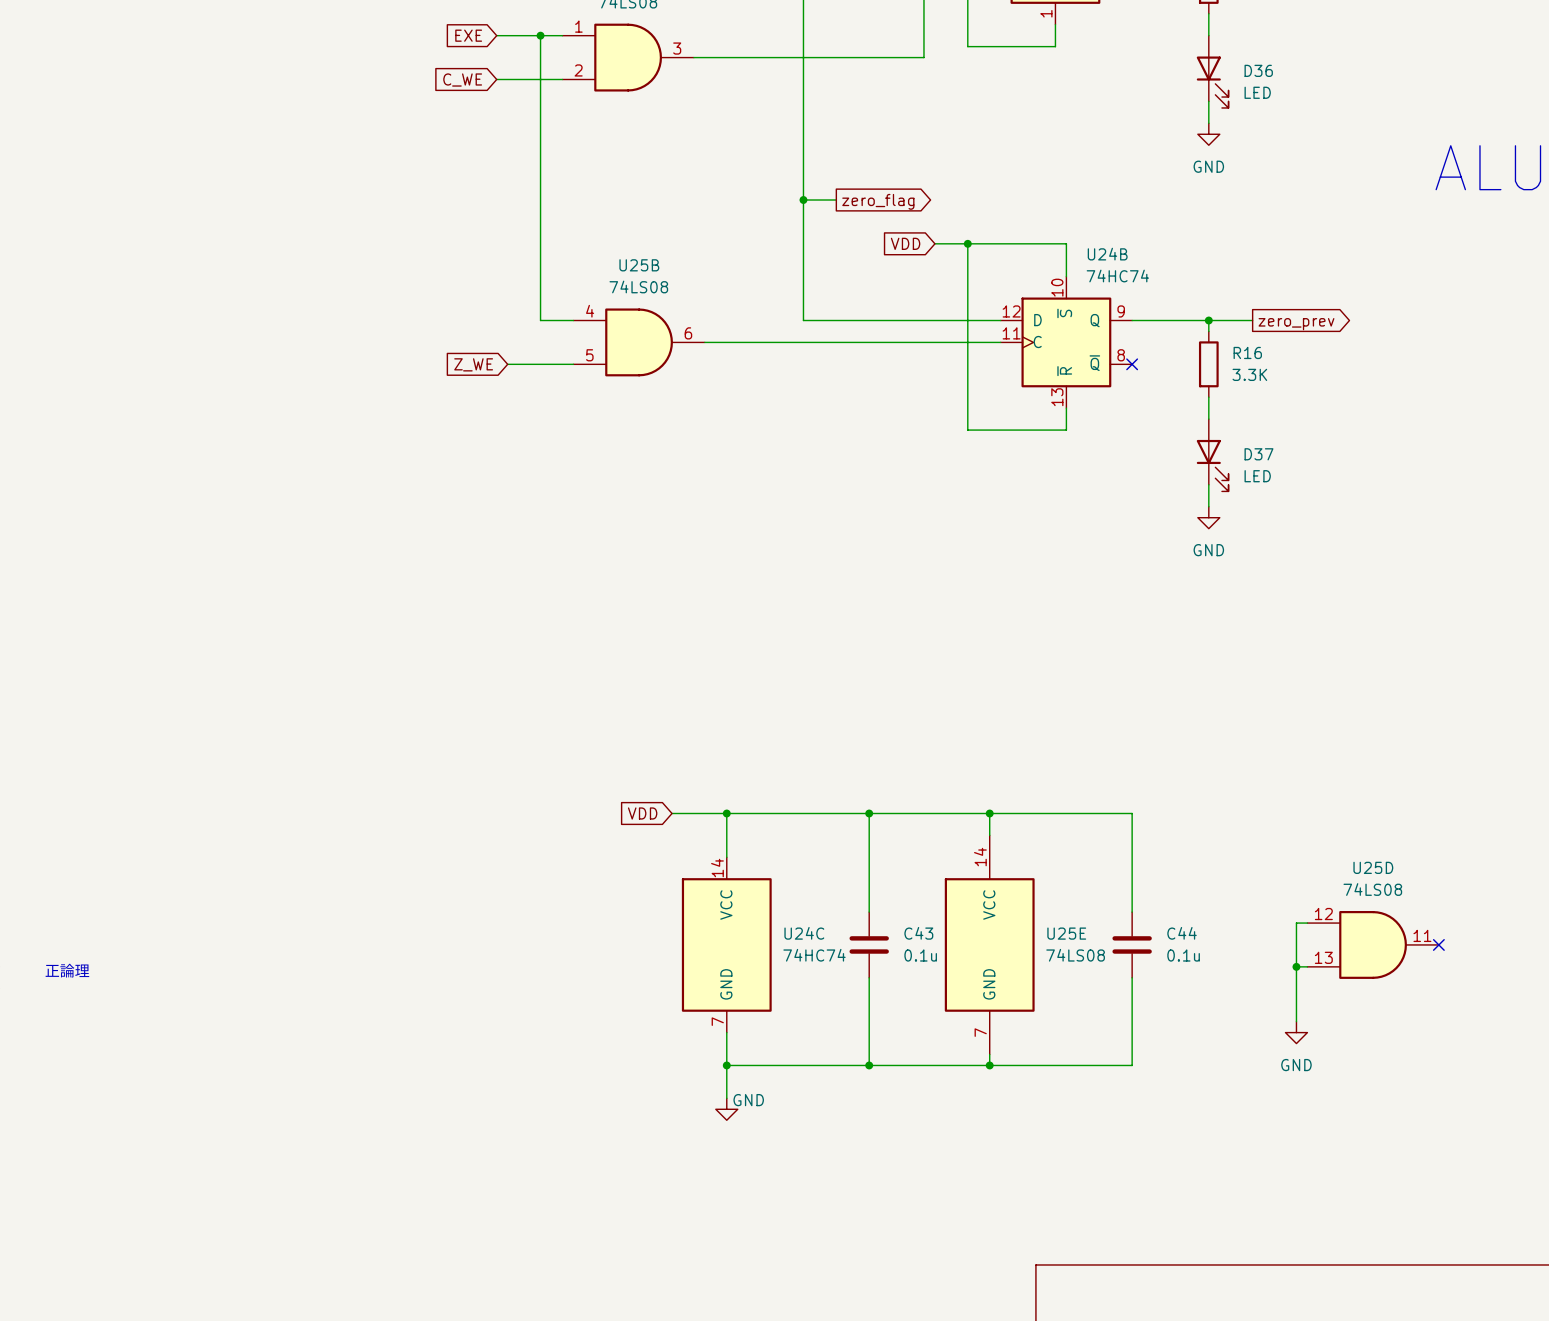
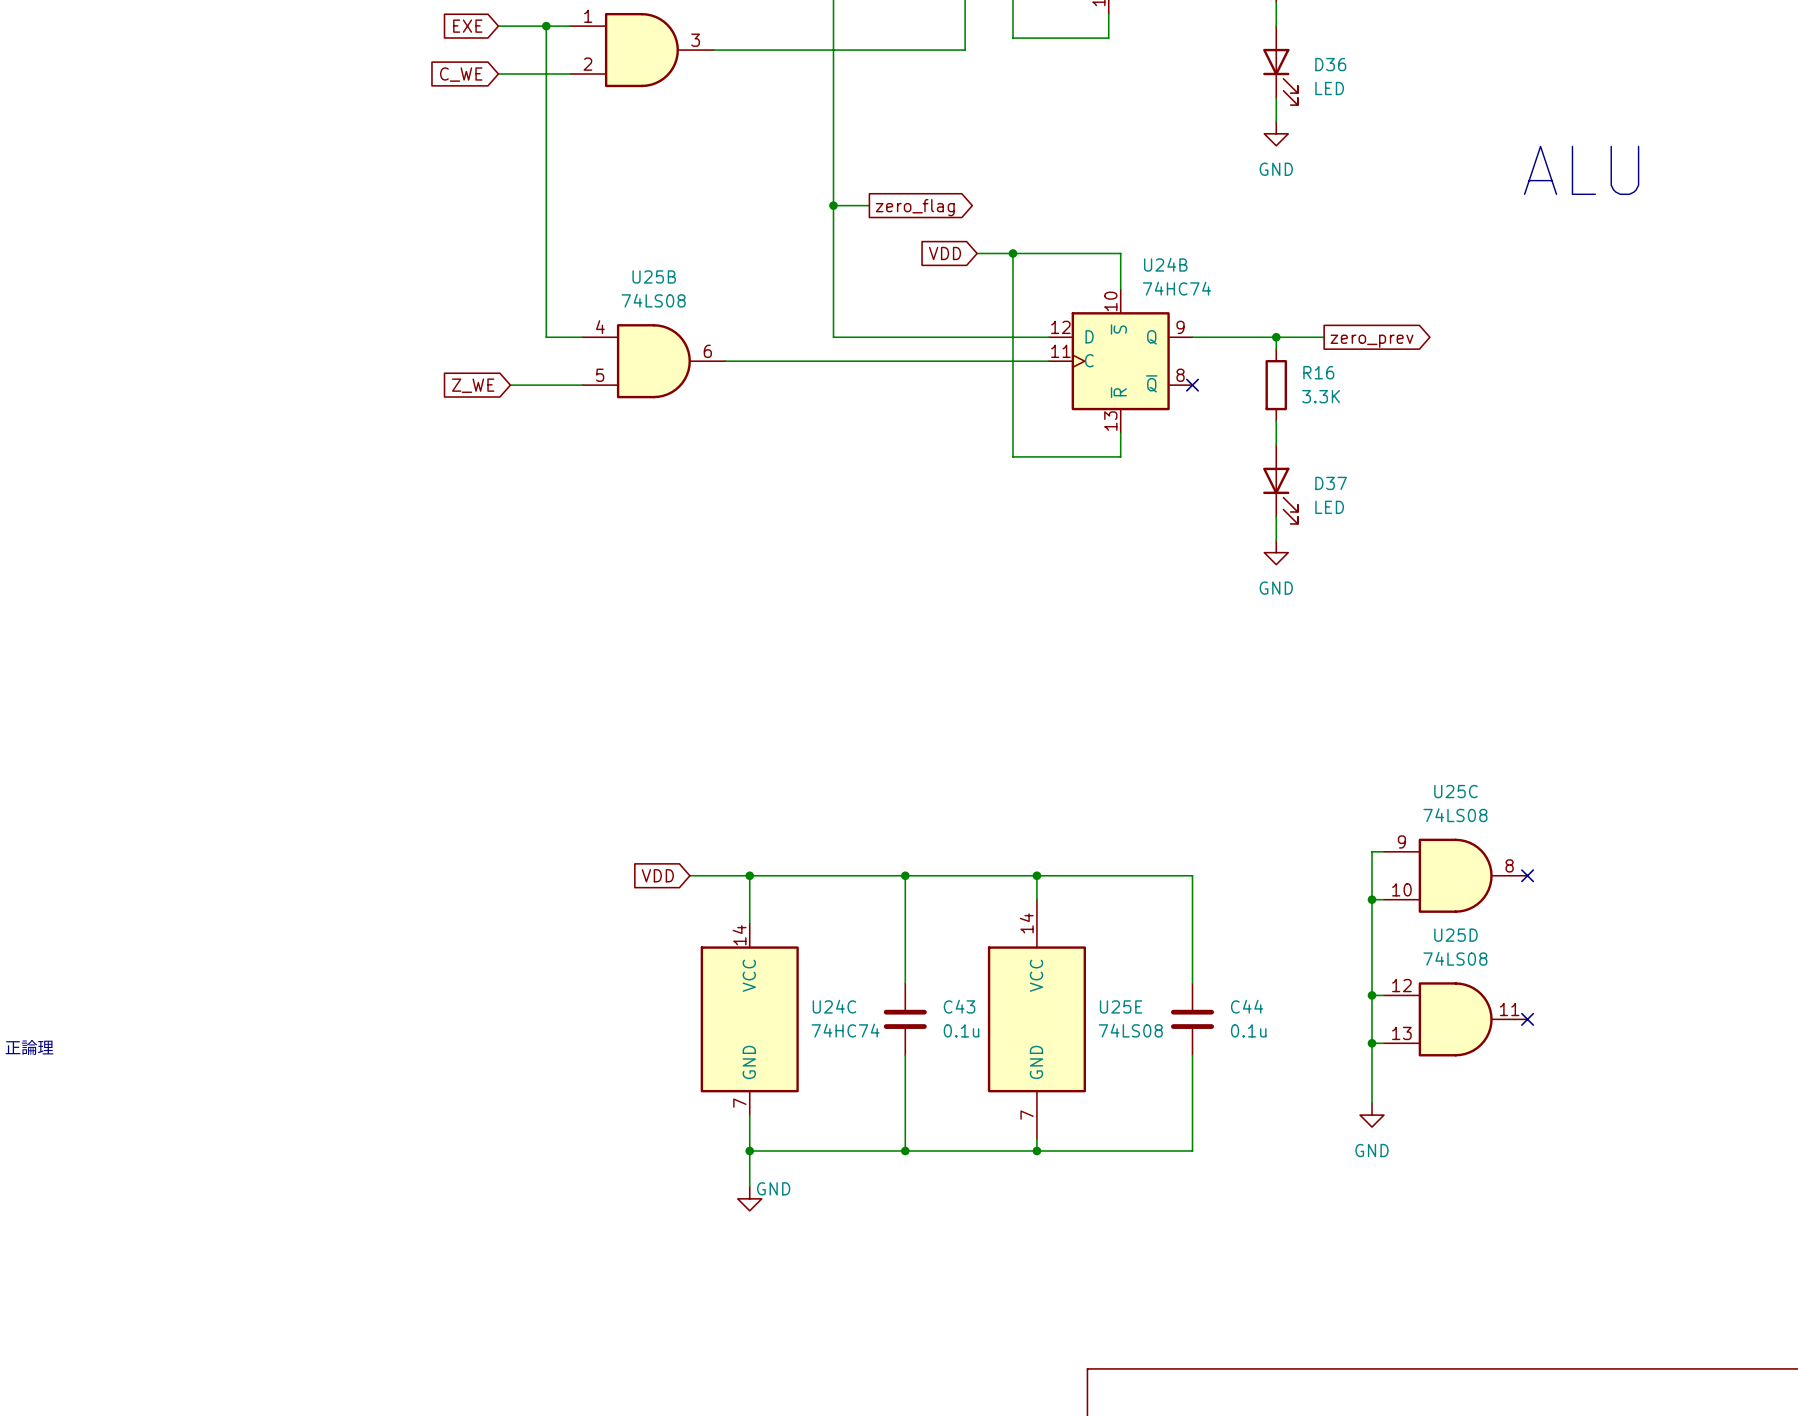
wire: none -> (1383, 851) (1372, 851) (1372, 995)
U25C: none -> 74LS08 (1455, 875)
no-connect mark: none -> (1527, 875)
wire: none -> (1372, 899) (1383, 899)
junction: none -> (1372, 899)
junction: none -> (1372, 995)

